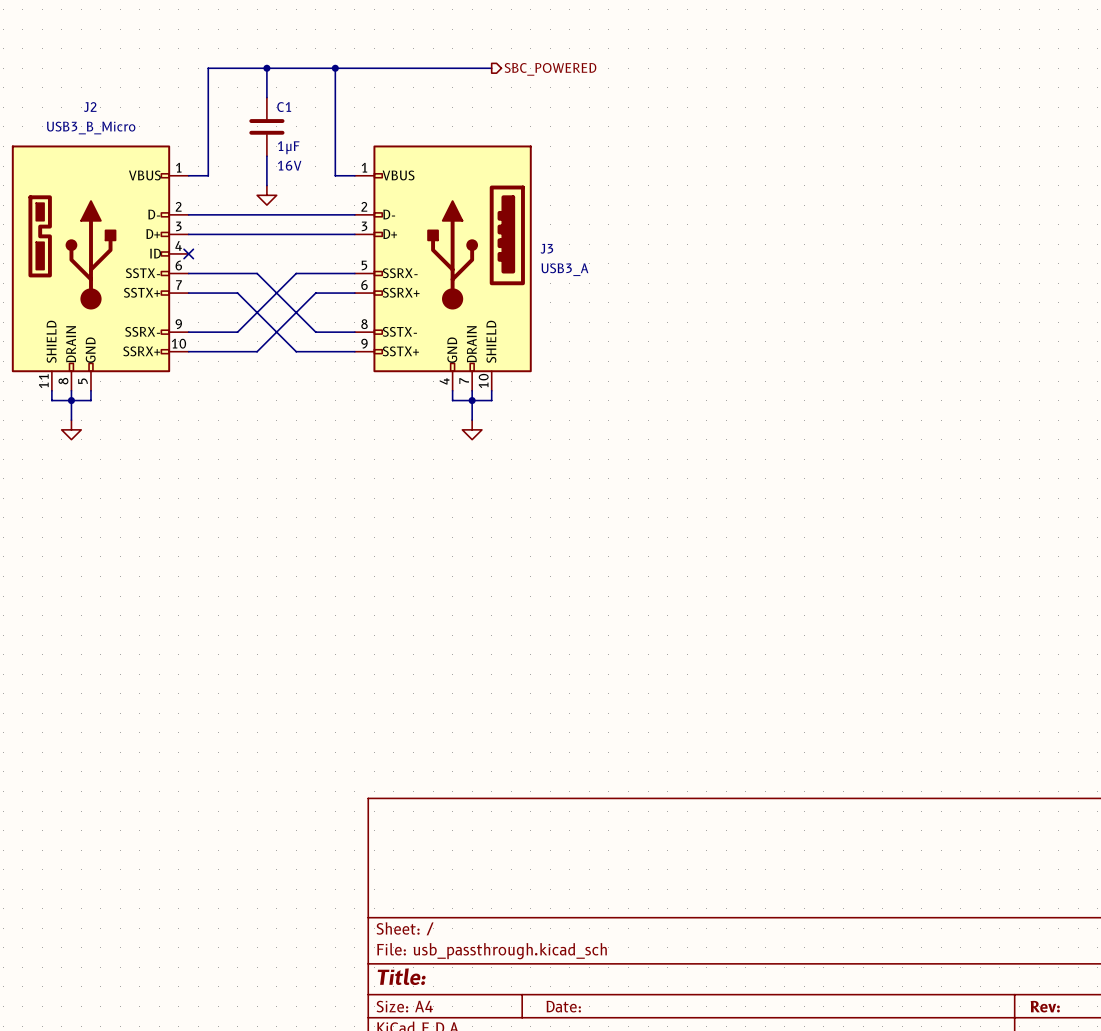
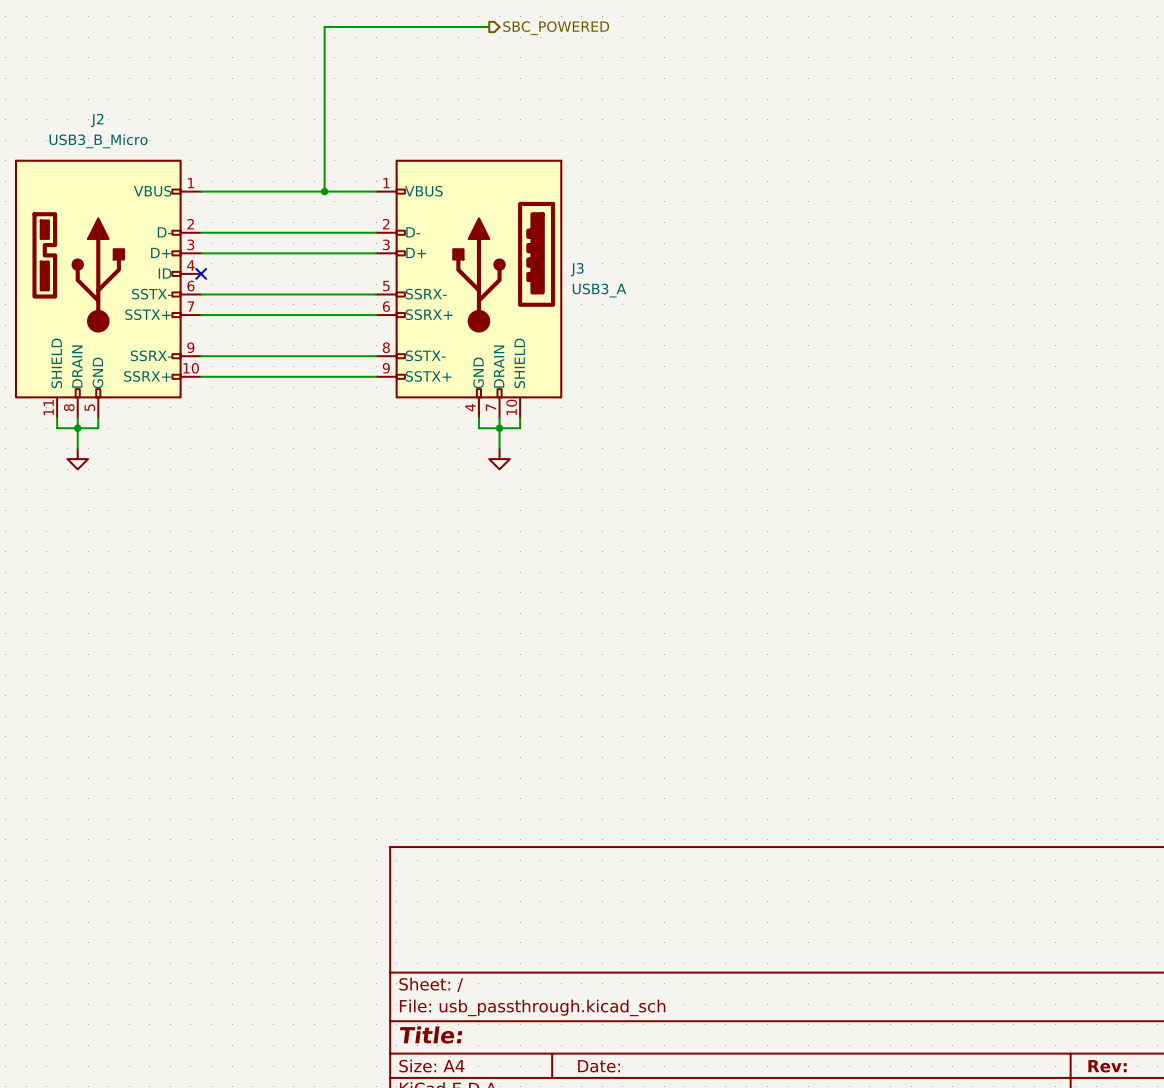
wire: none -> (489, 26) (324, 26) (324, 191)
wire: (266, 68) (266, 97) -> none
junction: (266, 68) -> none
wire: (335, 68) (335, 175) -> (221, 191) (355, 191)
junction: (335, 68) -> none
wire: (491, 68) (208, 68) (208, 175) -> none
hierarchical label position: SBC_POWERED (550, 69) -> SBC_POWERED (556, 28)
C1: 1μF (266, 126) -> none
wire: (266, 156) (266, 185) -> none
junction: none -> (324, 191)
power symbol: (266, 195) -> none
wire: (257, 273) (315, 332) -> (252, 356) (334, 356)
wire: (296, 273) (237, 332) -> (314, 294) (273, 294)
wire: (237, 293) (296, 351) -> (273, 376) (314, 376)
wire: (315, 293) (257, 351) -> (334, 315) (252, 315)

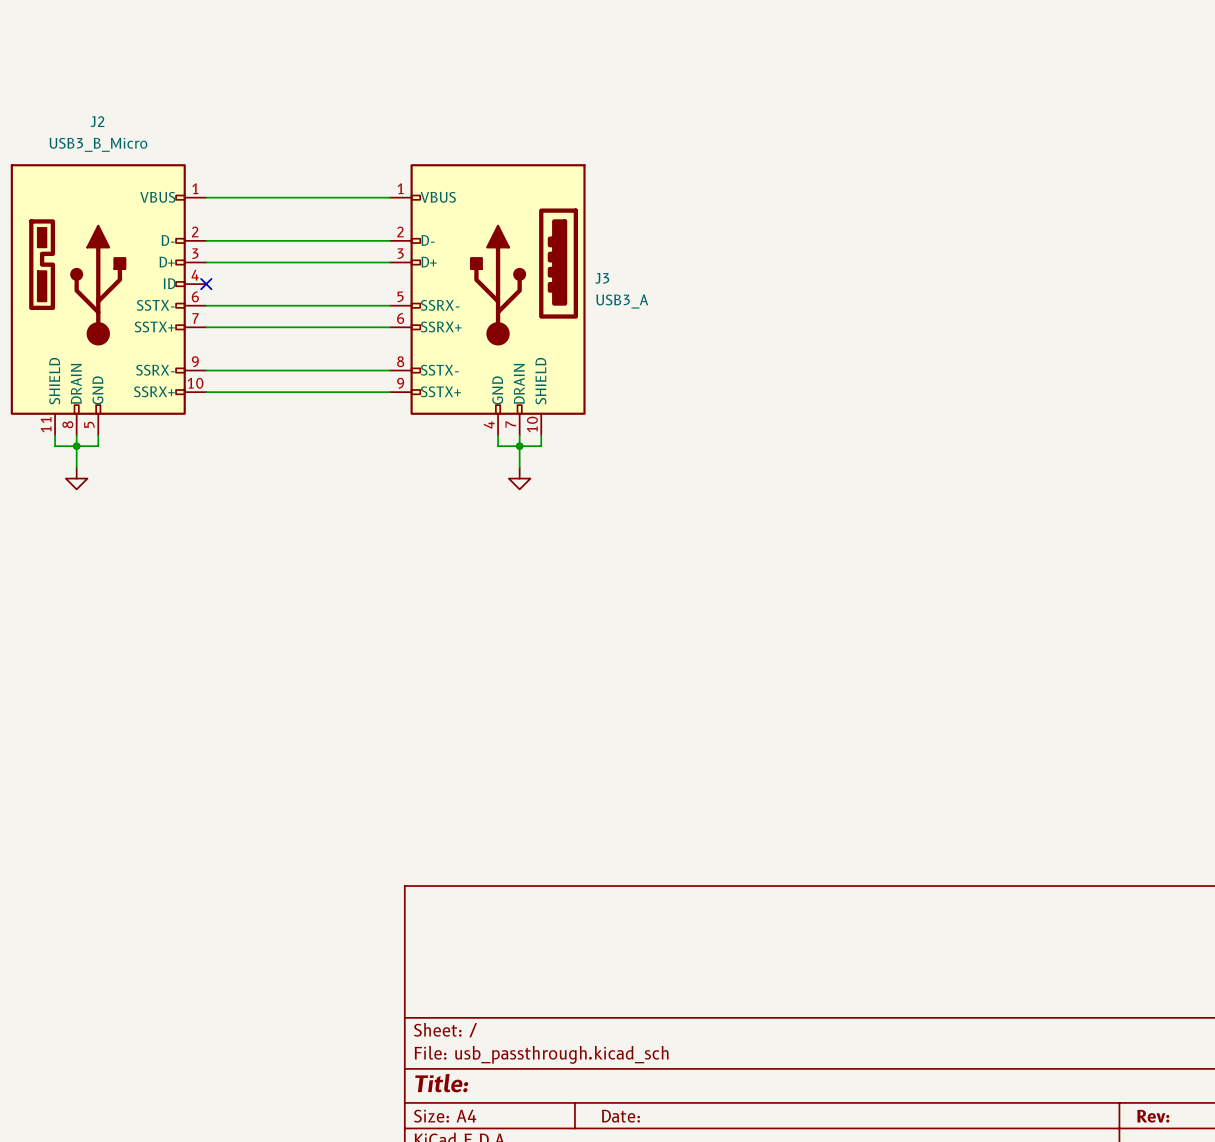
wire: (489, 26) (324, 26) (324, 191) -> none
hierarchical label: SBC_POWERED (556, 28) -> none
junction: (324, 191) -> none

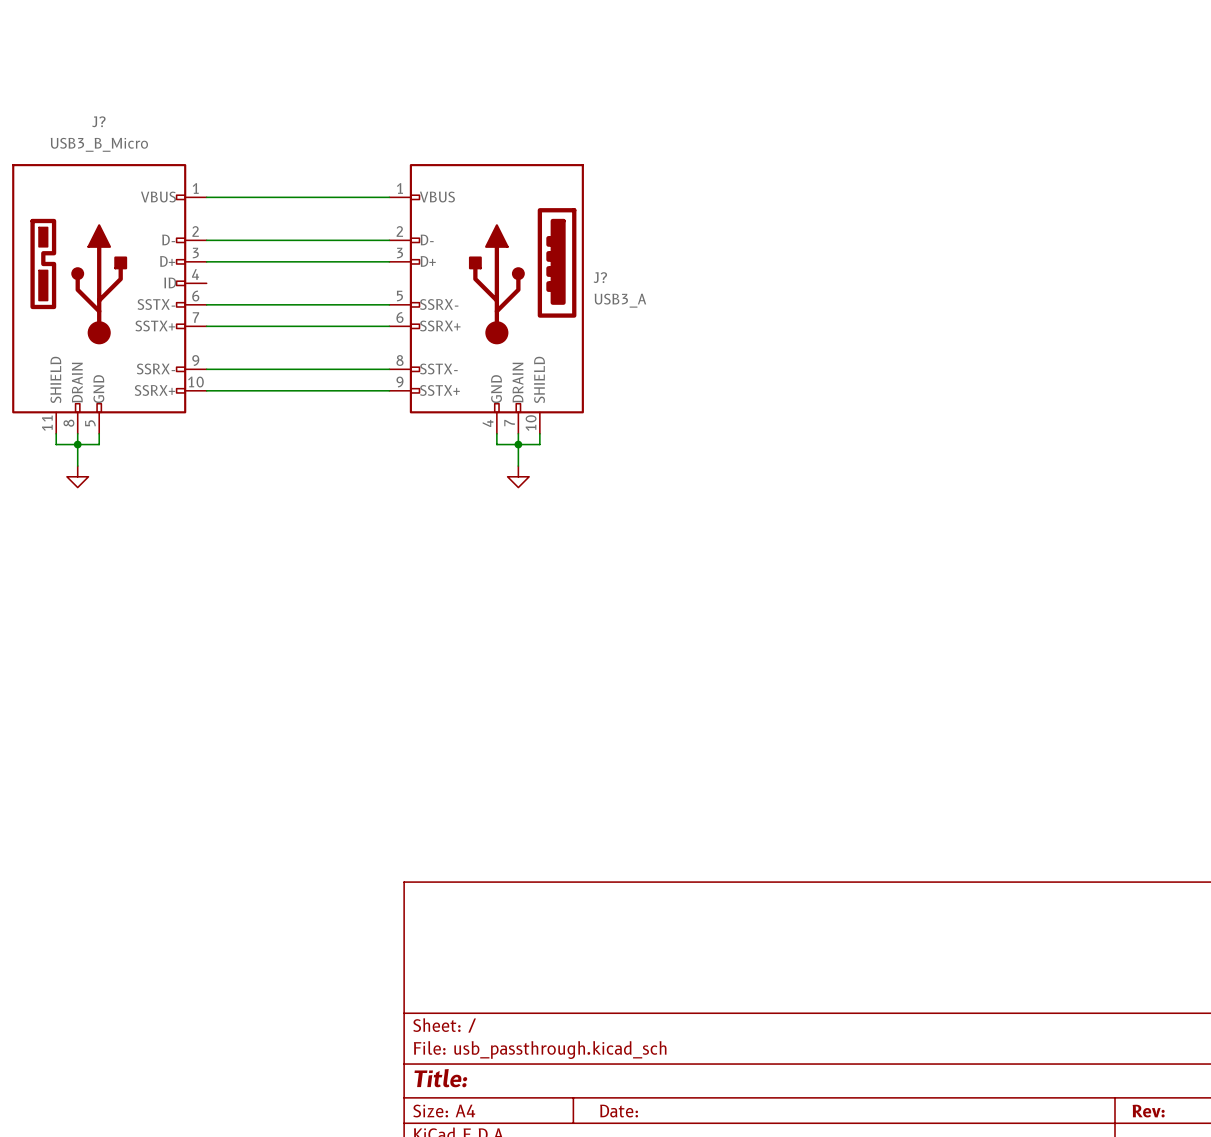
J2 name: J2 (97, 121) -> J? (98, 121)
J3 name: J3 (602, 278) -> J? (600, 277)
no-connect mark: (206, 284) -> none

